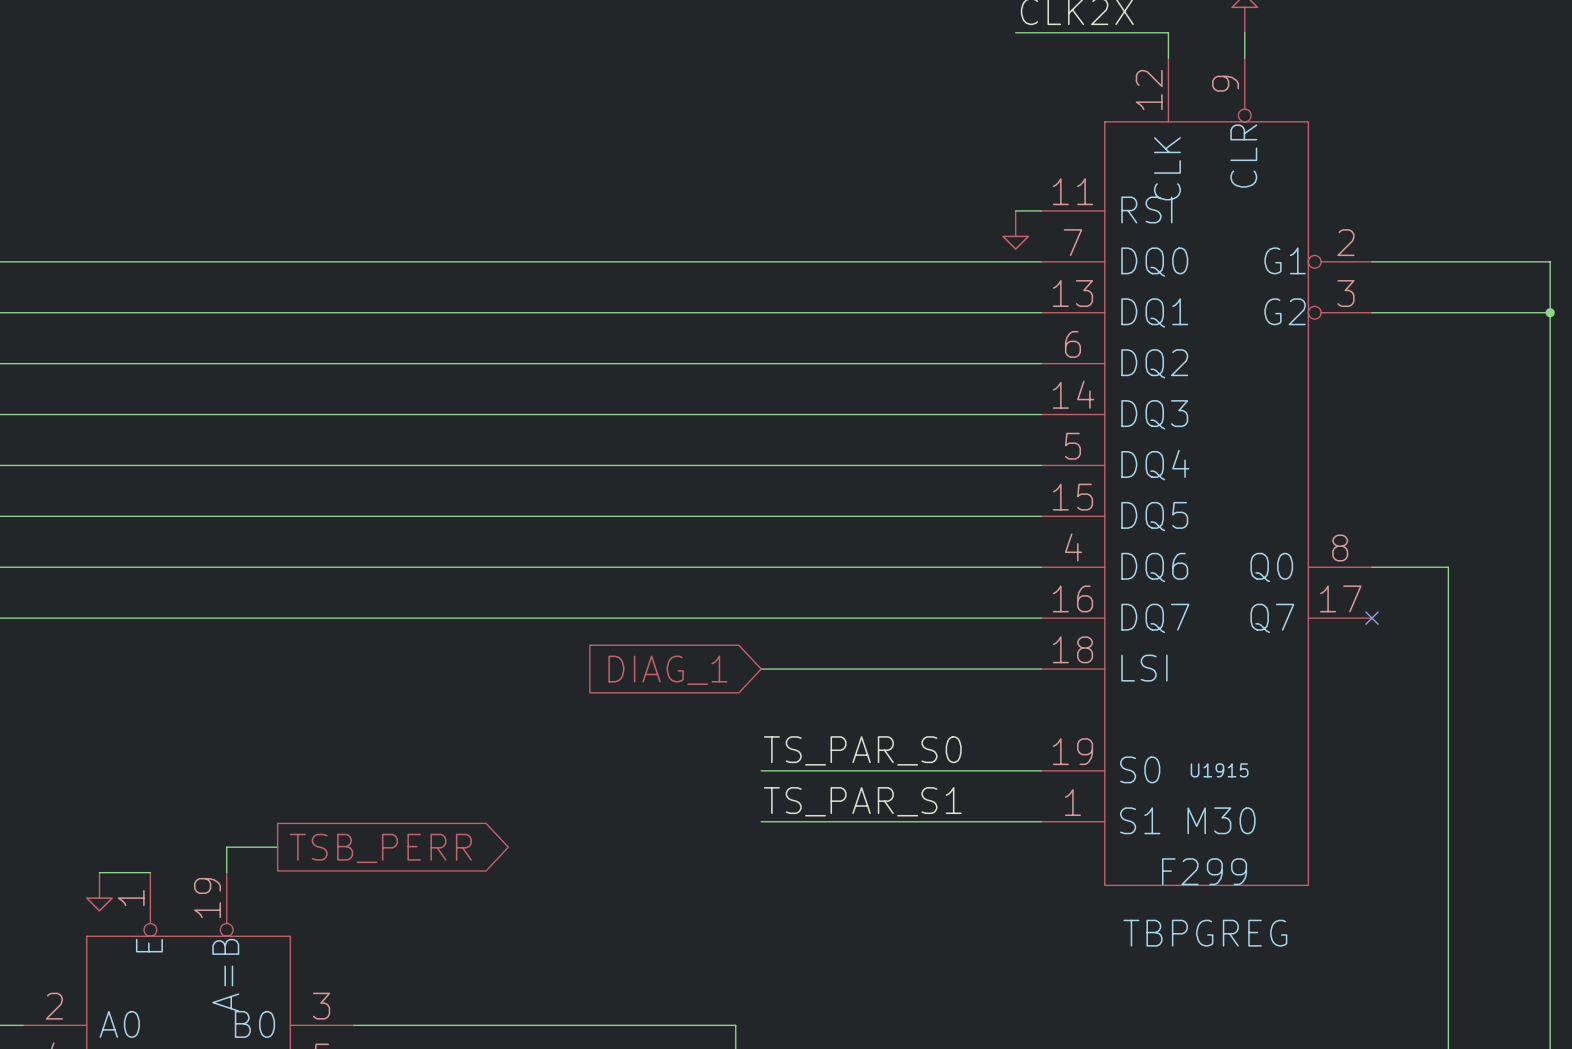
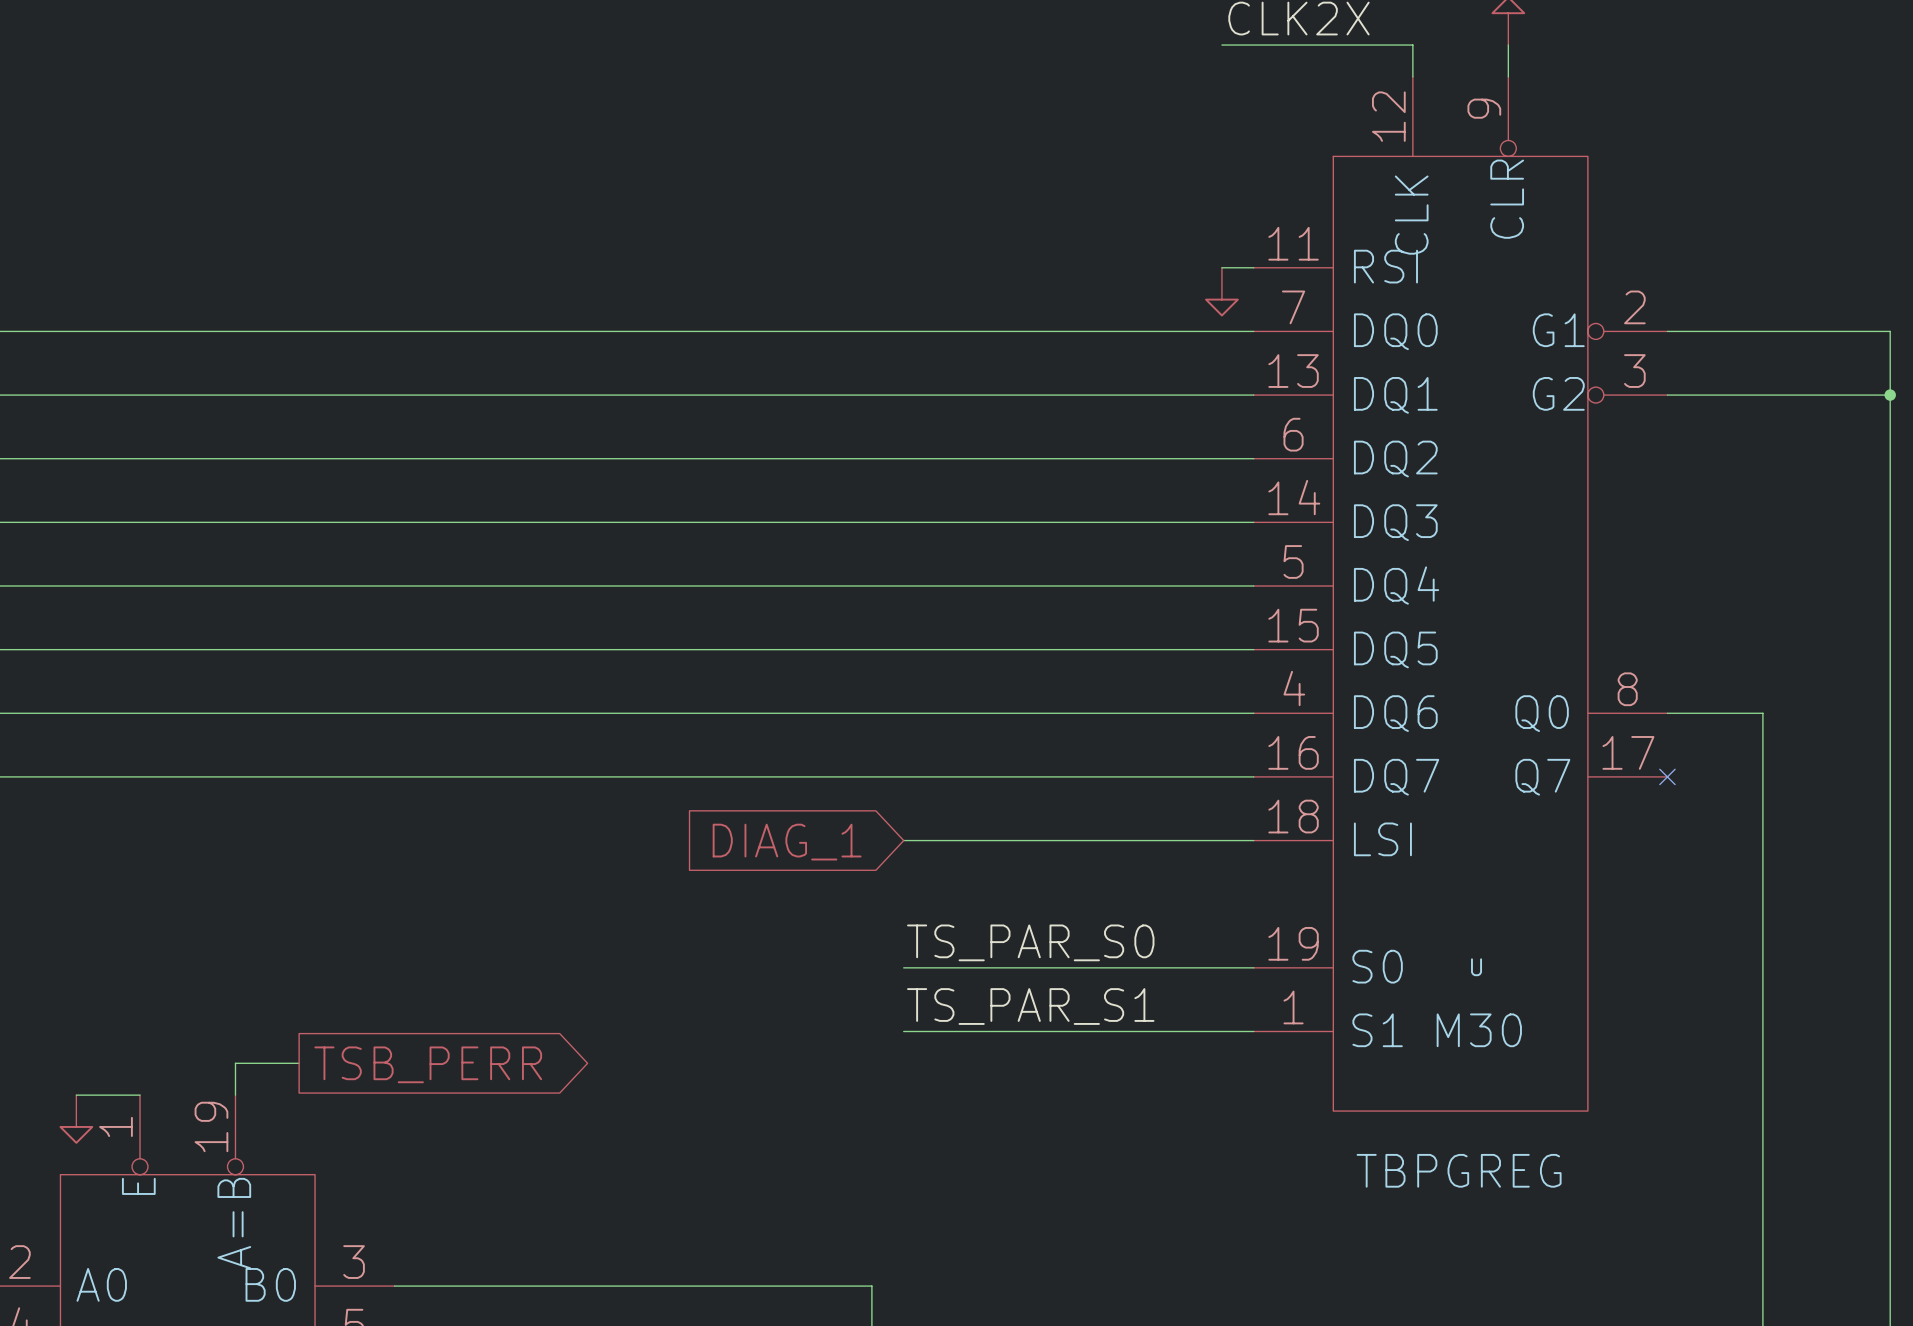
U1915 name: U1915 (1219, 770) -> U (1476, 967)
U1915 value: F299 (1204, 871) -> none

